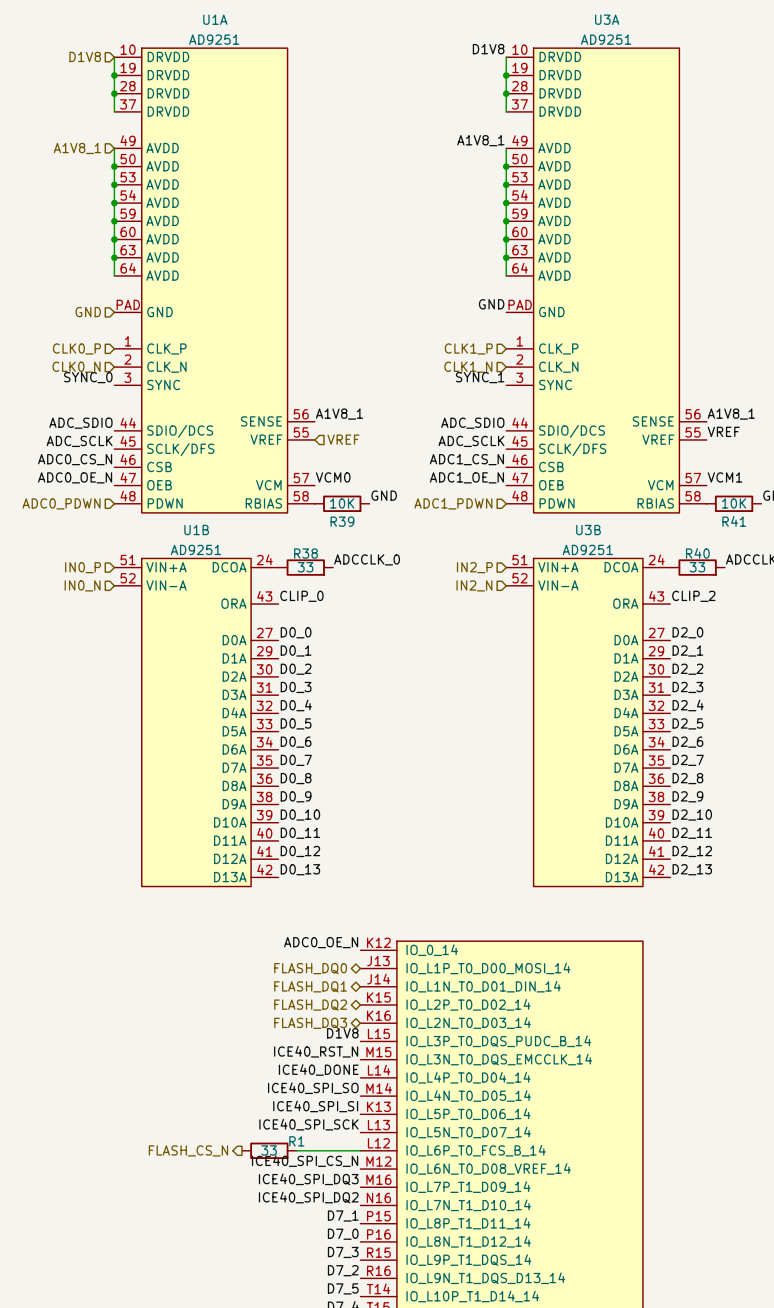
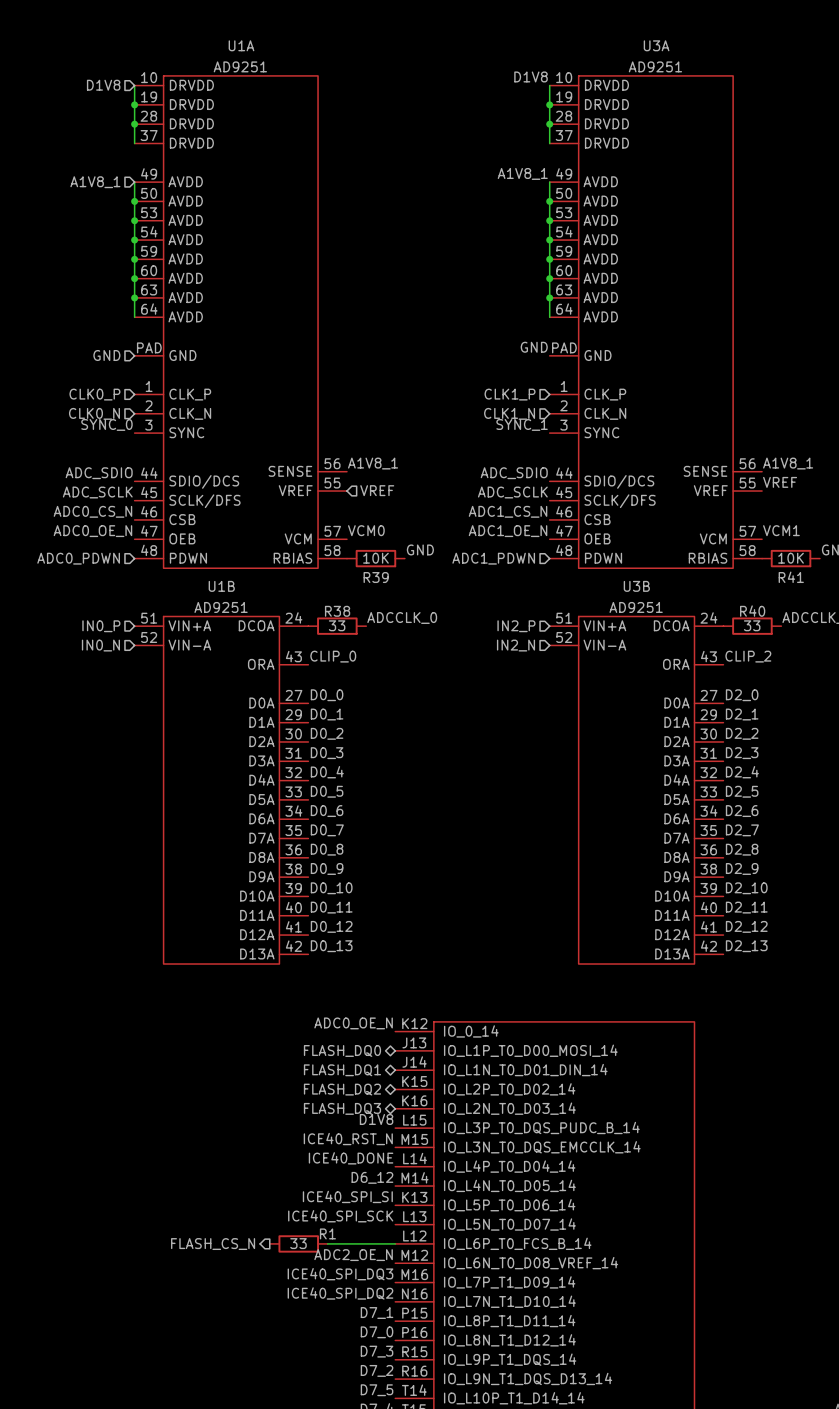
label: ICE40_SPI_SO (313, 1088) -> D6_12 (372, 1177)
label: ICE40_SPI_CS_N (305, 1161) -> ADC2_OE_N (353, 1255)

